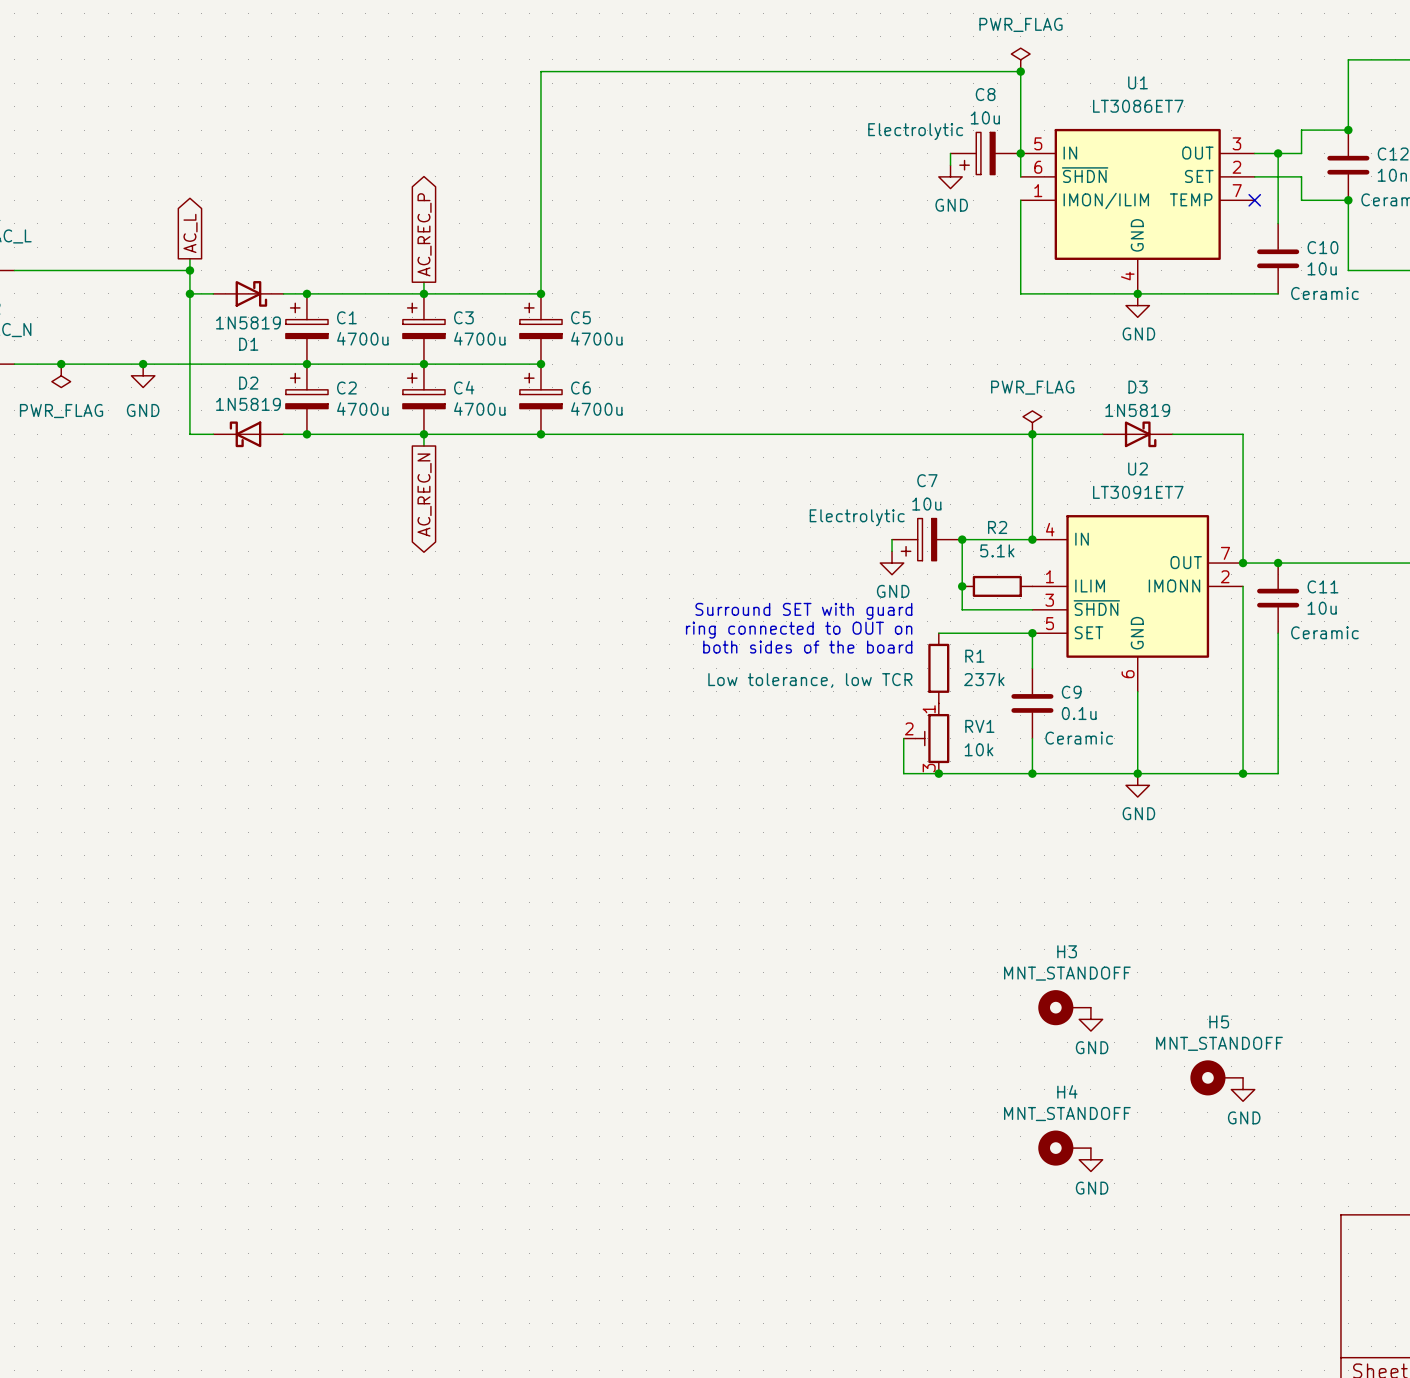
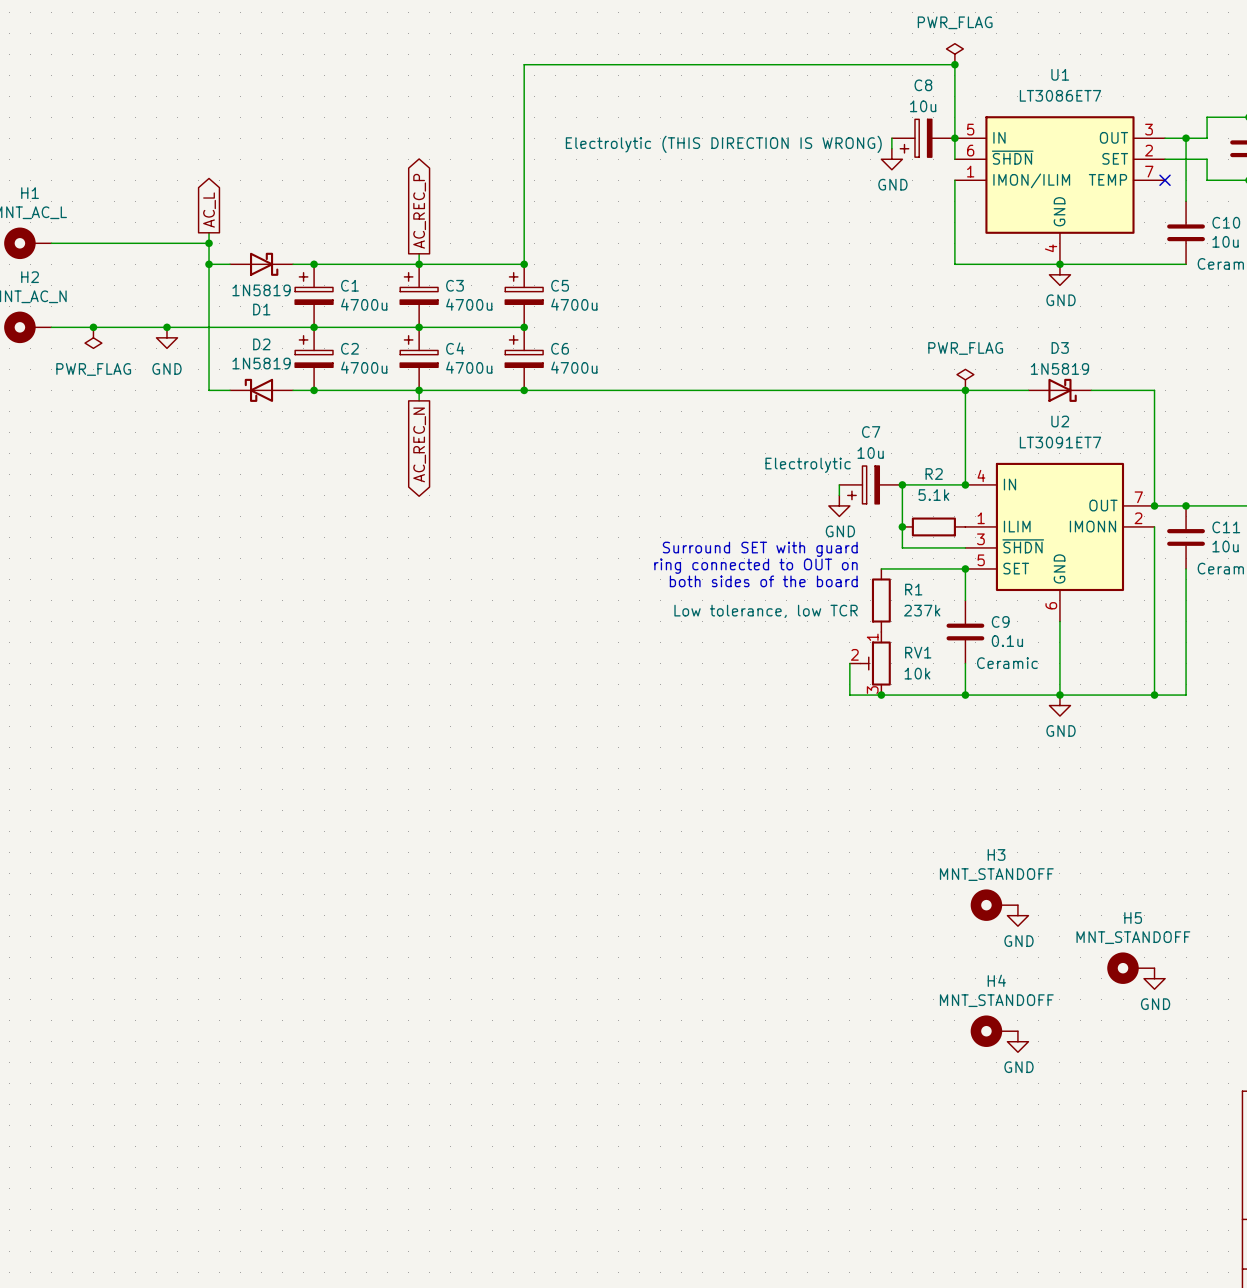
C8 text: Electrolytic (915, 131) -> Electrolytic (THIS DIRECTION IS WRONG) (723, 144)

